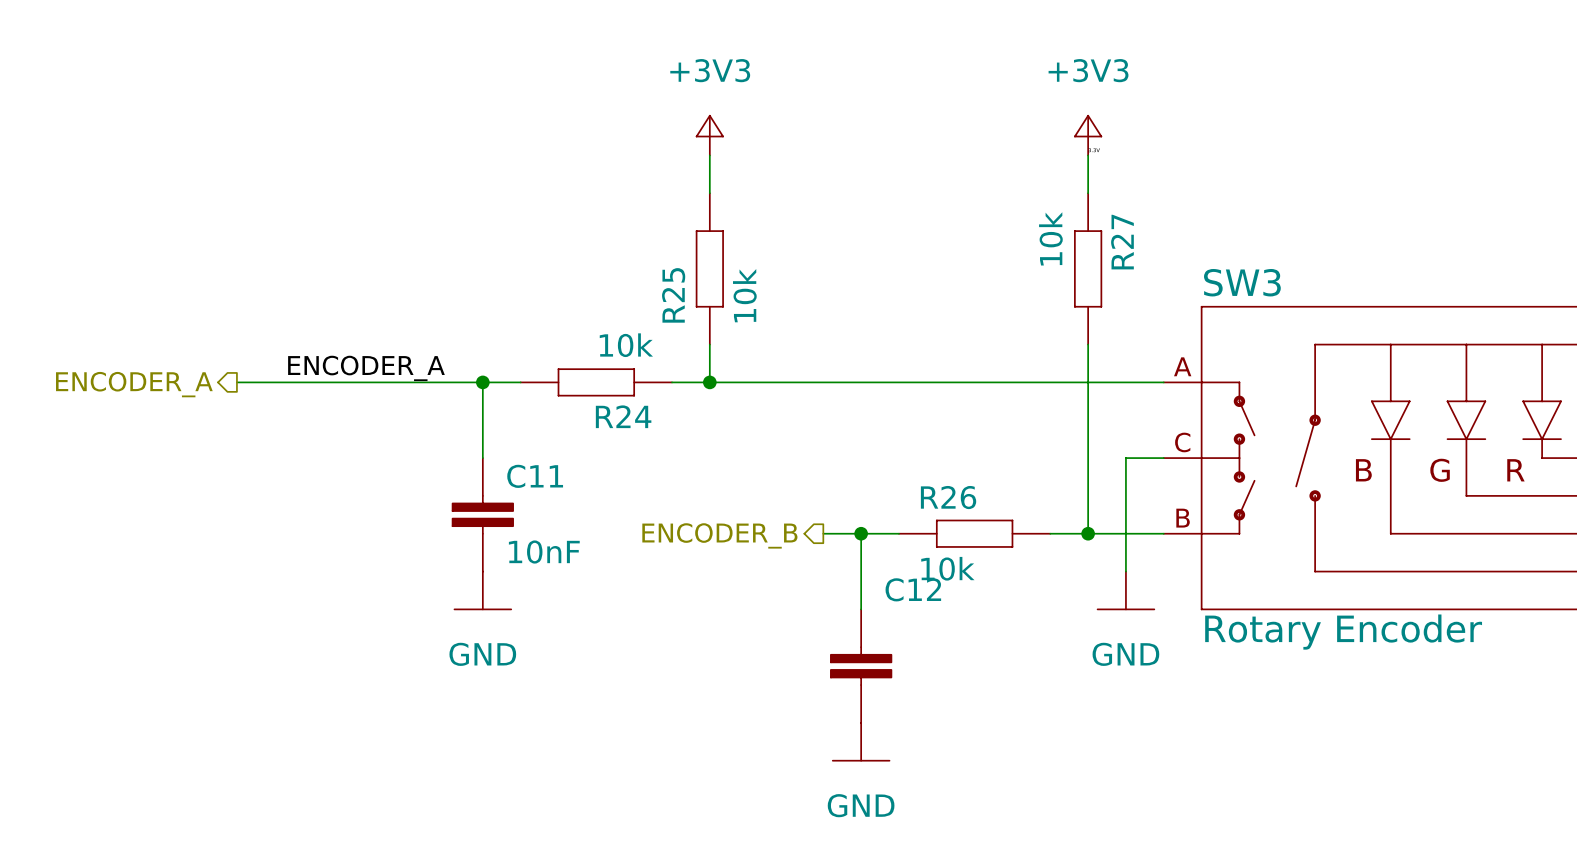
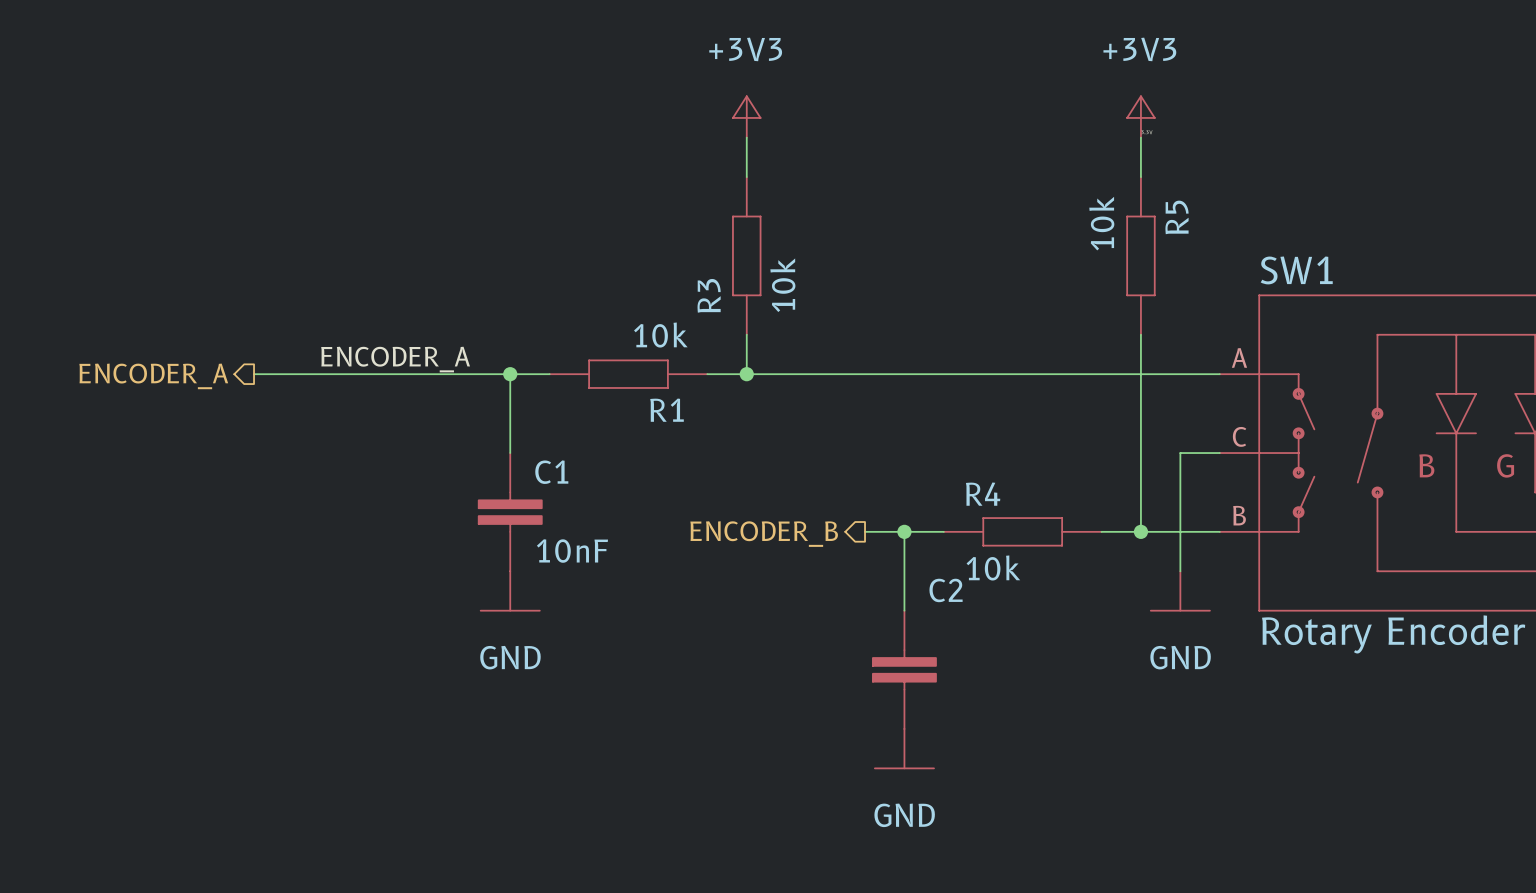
R27 name: R27 (1122, 242) -> R5 (1177, 217)
SW3 name: SW3 (1242, 282) -> SW1 (1296, 270)
R25 name: R25 (673, 295) -> R3 (709, 295)
R24 name: R24 (623, 416) -> R1 (667, 410)
C11 name: C11 (535, 476) -> C1 (551, 472)
R26 name: R26 (948, 497) -> R4 (983, 494)
C12 name: C12 (913, 589) -> C2 (946, 590)

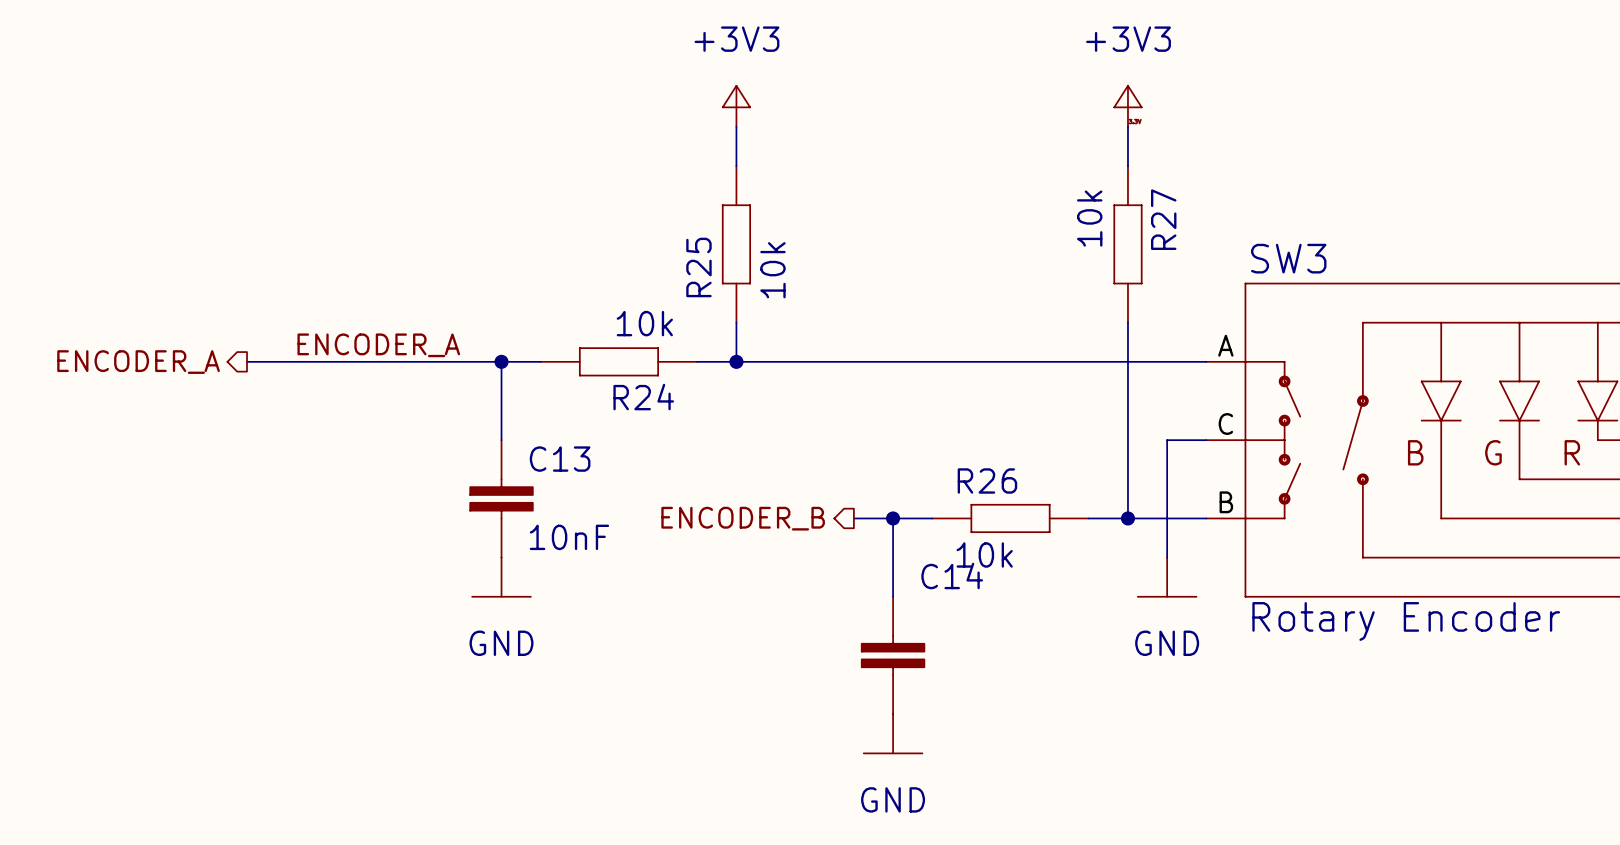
R5 name: R5 (1177, 217) -> R27 (1163, 219)
SW1 name: SW1 (1296, 270) -> SW3 (1288, 258)
R3 name: R3 (709, 295) -> R25 (698, 267)
R1 name: R1 (667, 410) -> R24 (643, 397)
C1 name: C1 (551, 472) -> C13 (560, 459)
R4 name: R4 (983, 494) -> R26 (987, 480)
C2 name: C2 (946, 590) -> C14 (952, 575)

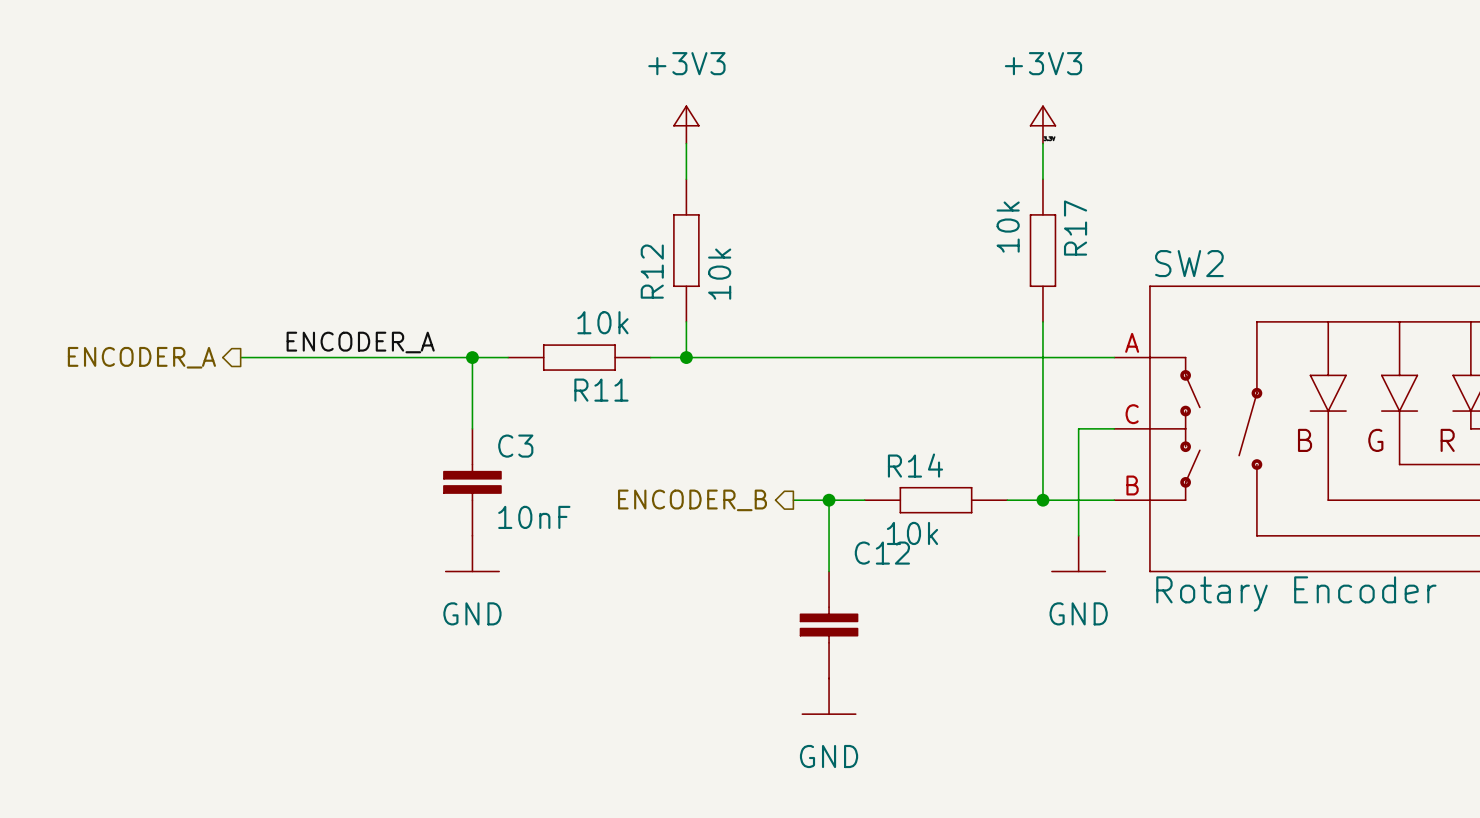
R27 name: R27 (1163, 219) -> R17 (1075, 228)
SW3 name: SW3 (1288, 258) -> SW2 (1189, 263)
R25 name: R25 (698, 267) -> R12 (652, 271)
R24 name: R24 (643, 397) -> R11 (601, 390)
C13 name: C13 (560, 459) -> C3 (515, 446)
R26 name: R26 (987, 480) -> R14 (915, 465)
C14 name: C14 (952, 575) -> C12 (882, 553)

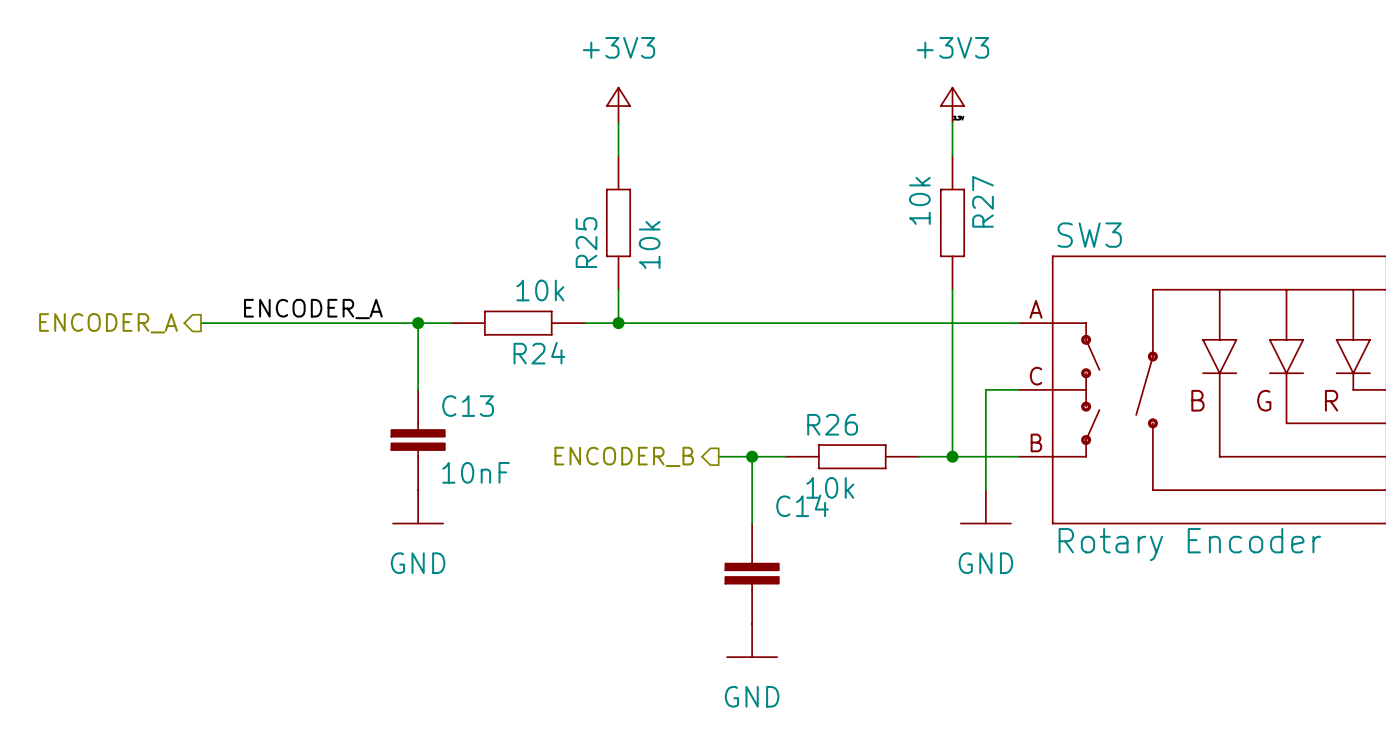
R17 name: R17 (1075, 228) -> R27 (983, 201)
SW2 name: SW2 (1189, 263) -> SW3 (1089, 235)
R12 name: R12 (652, 271) -> R25 (586, 242)
R11 name: R11 (601, 390) -> R24 (539, 353)
C3 name: C3 (515, 446) -> C13 (468, 406)
R14 name: R14 (915, 465) -> R26 (832, 424)
C12 name: C12 (882, 553) -> C14 (802, 505)

